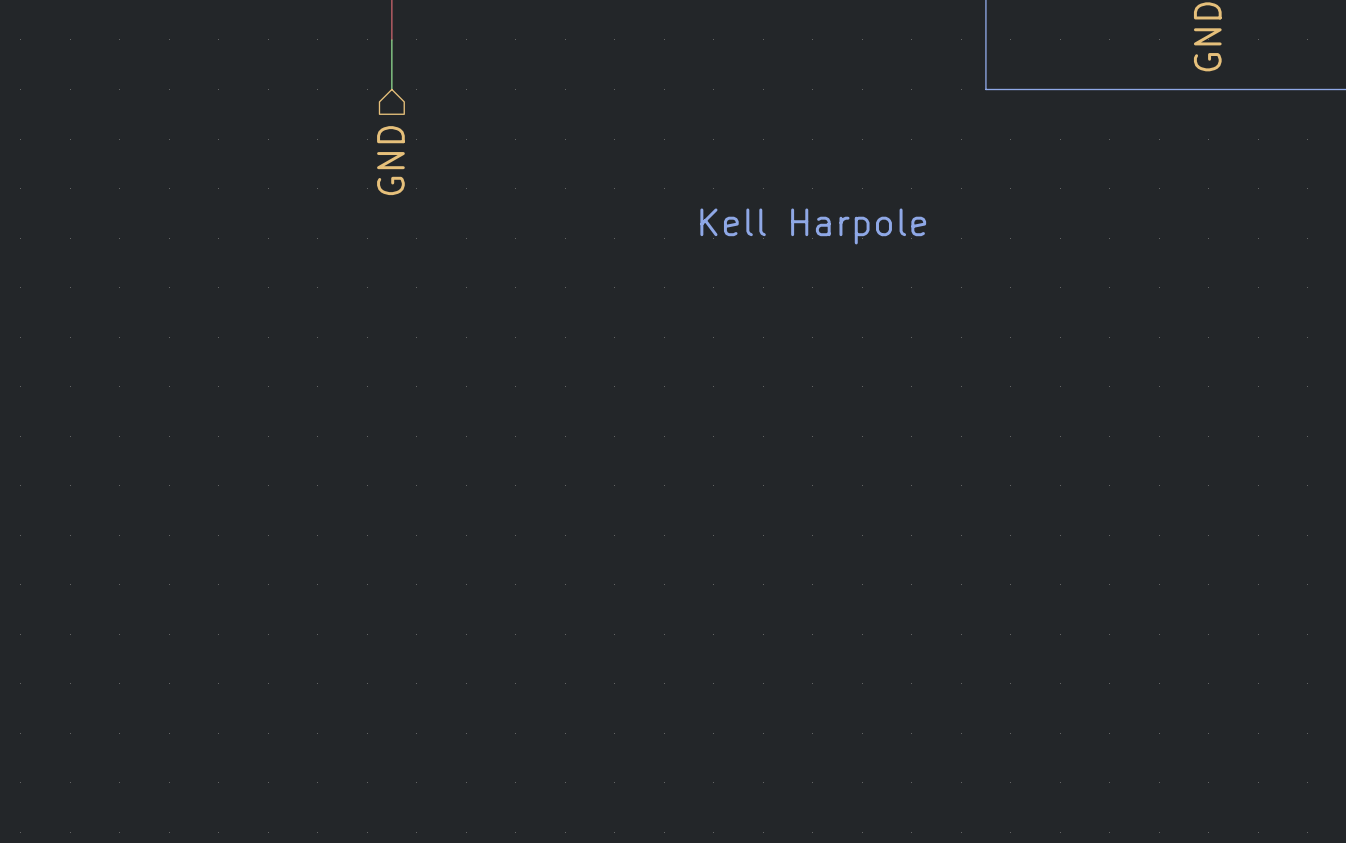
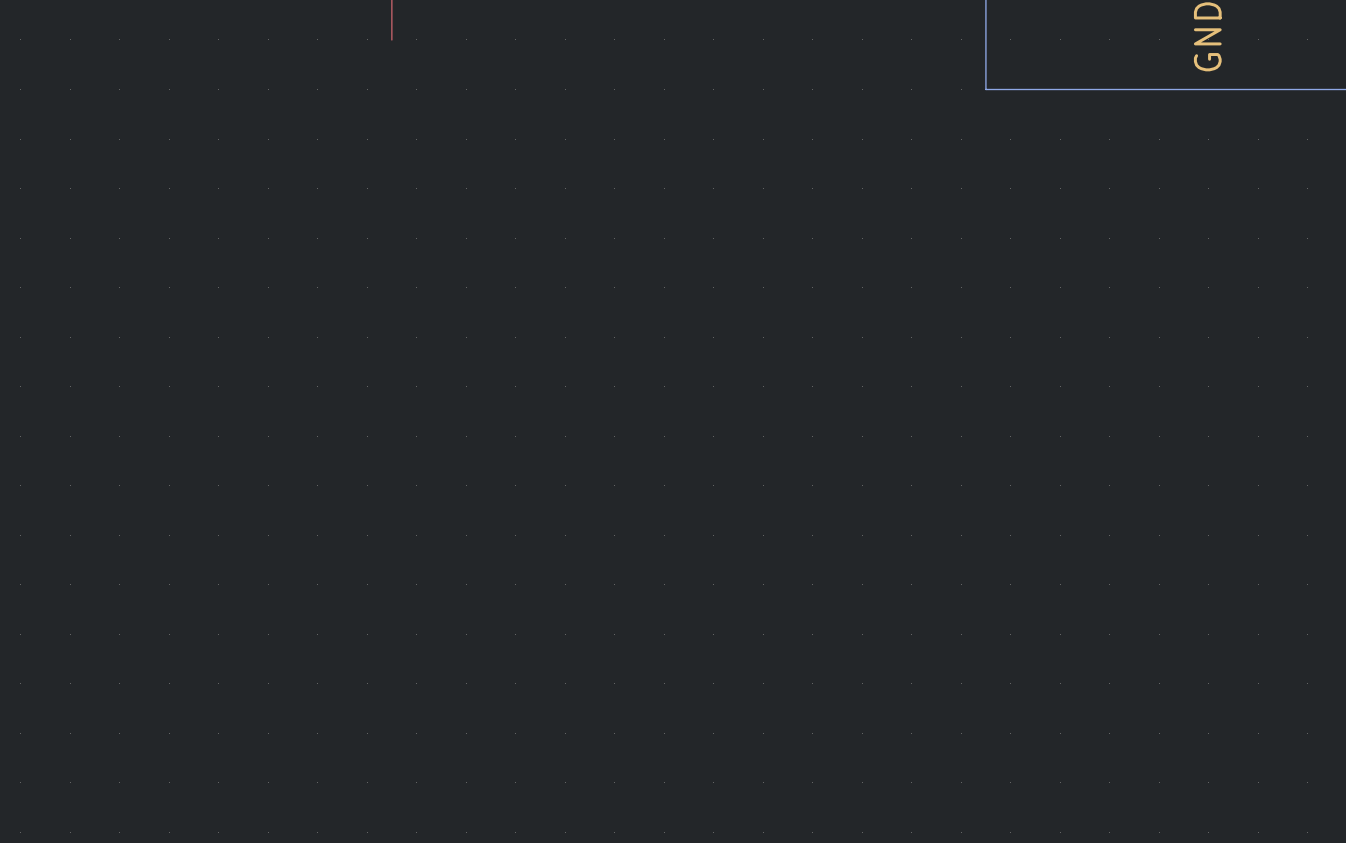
wire: (391, 39) (391, 89) -> none
hierarchical label: GND (390, 160) -> none
text: Kell Harpole (813, 226) -> none

